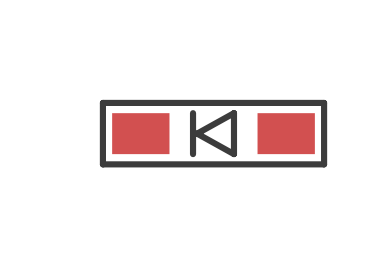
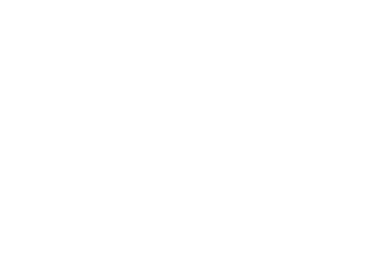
part: (213, 133) -> none

